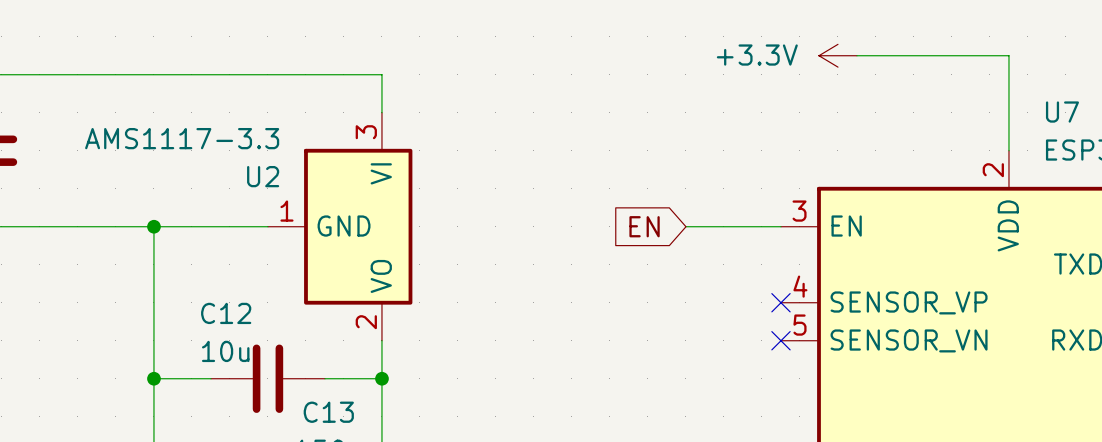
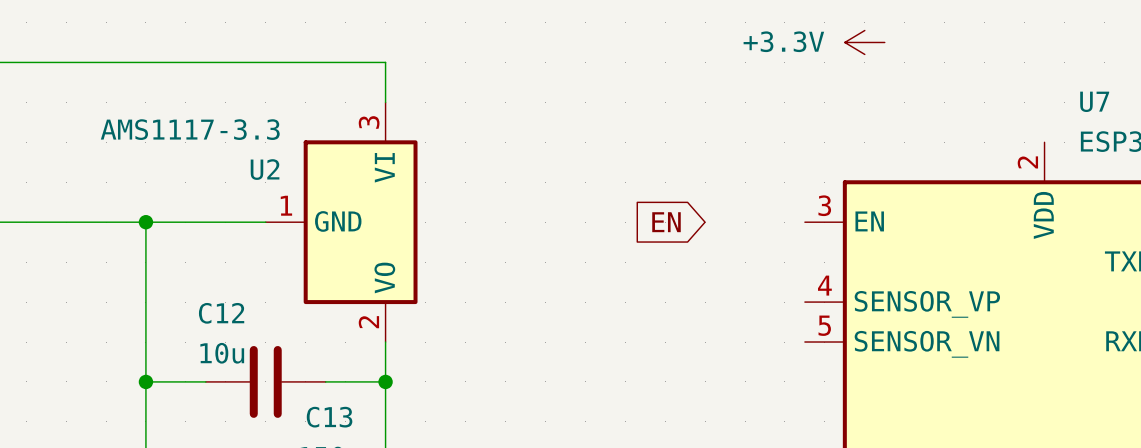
wire: (856, 55) (1008, 55) (1008, 150) -> none
wire: (685, 226) (780, 226) -> none
no-connect mark: (780, 302) -> none
no-connect mark: (780, 340) -> none

